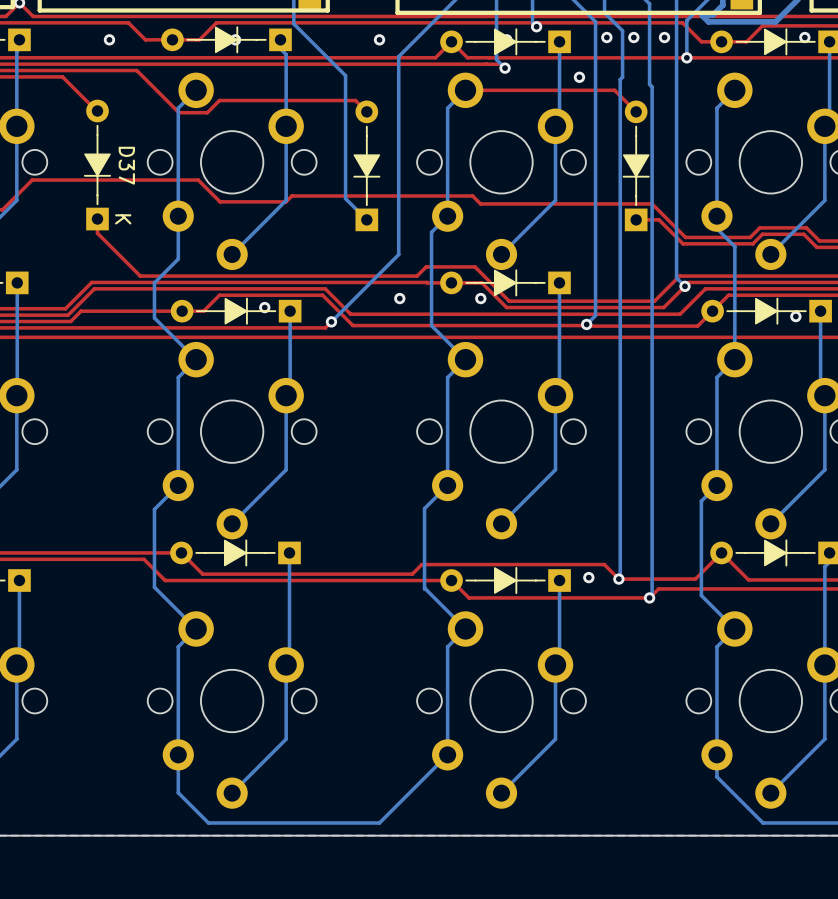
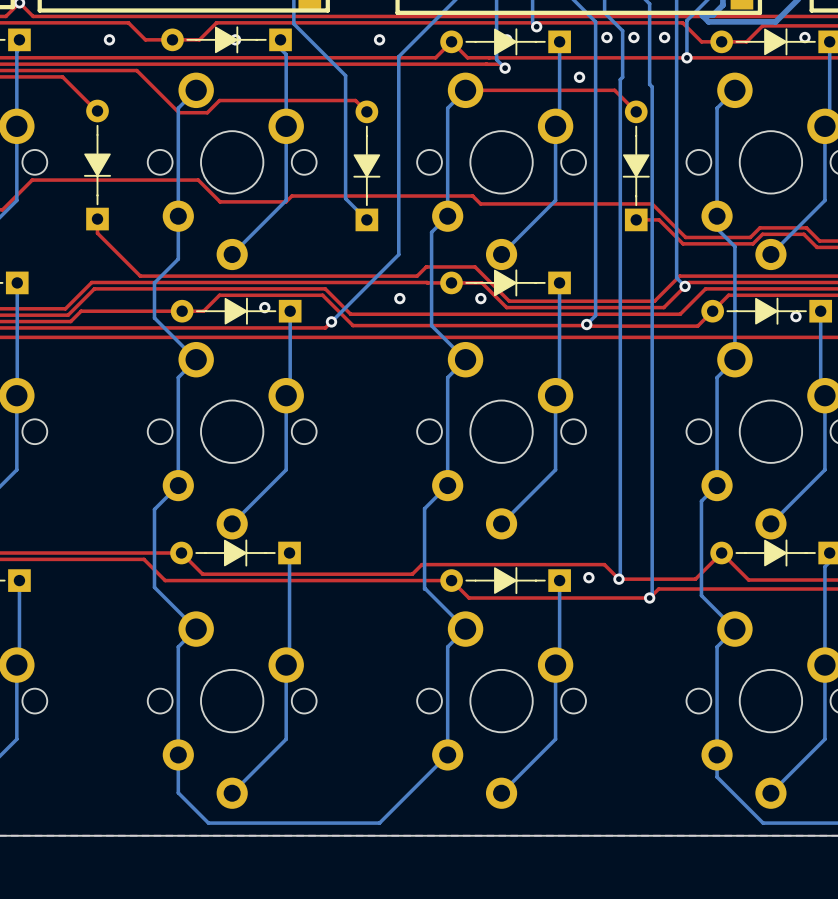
D37 name: D37 (126, 165) -> none
D37 text: K (123, 219) -> none

